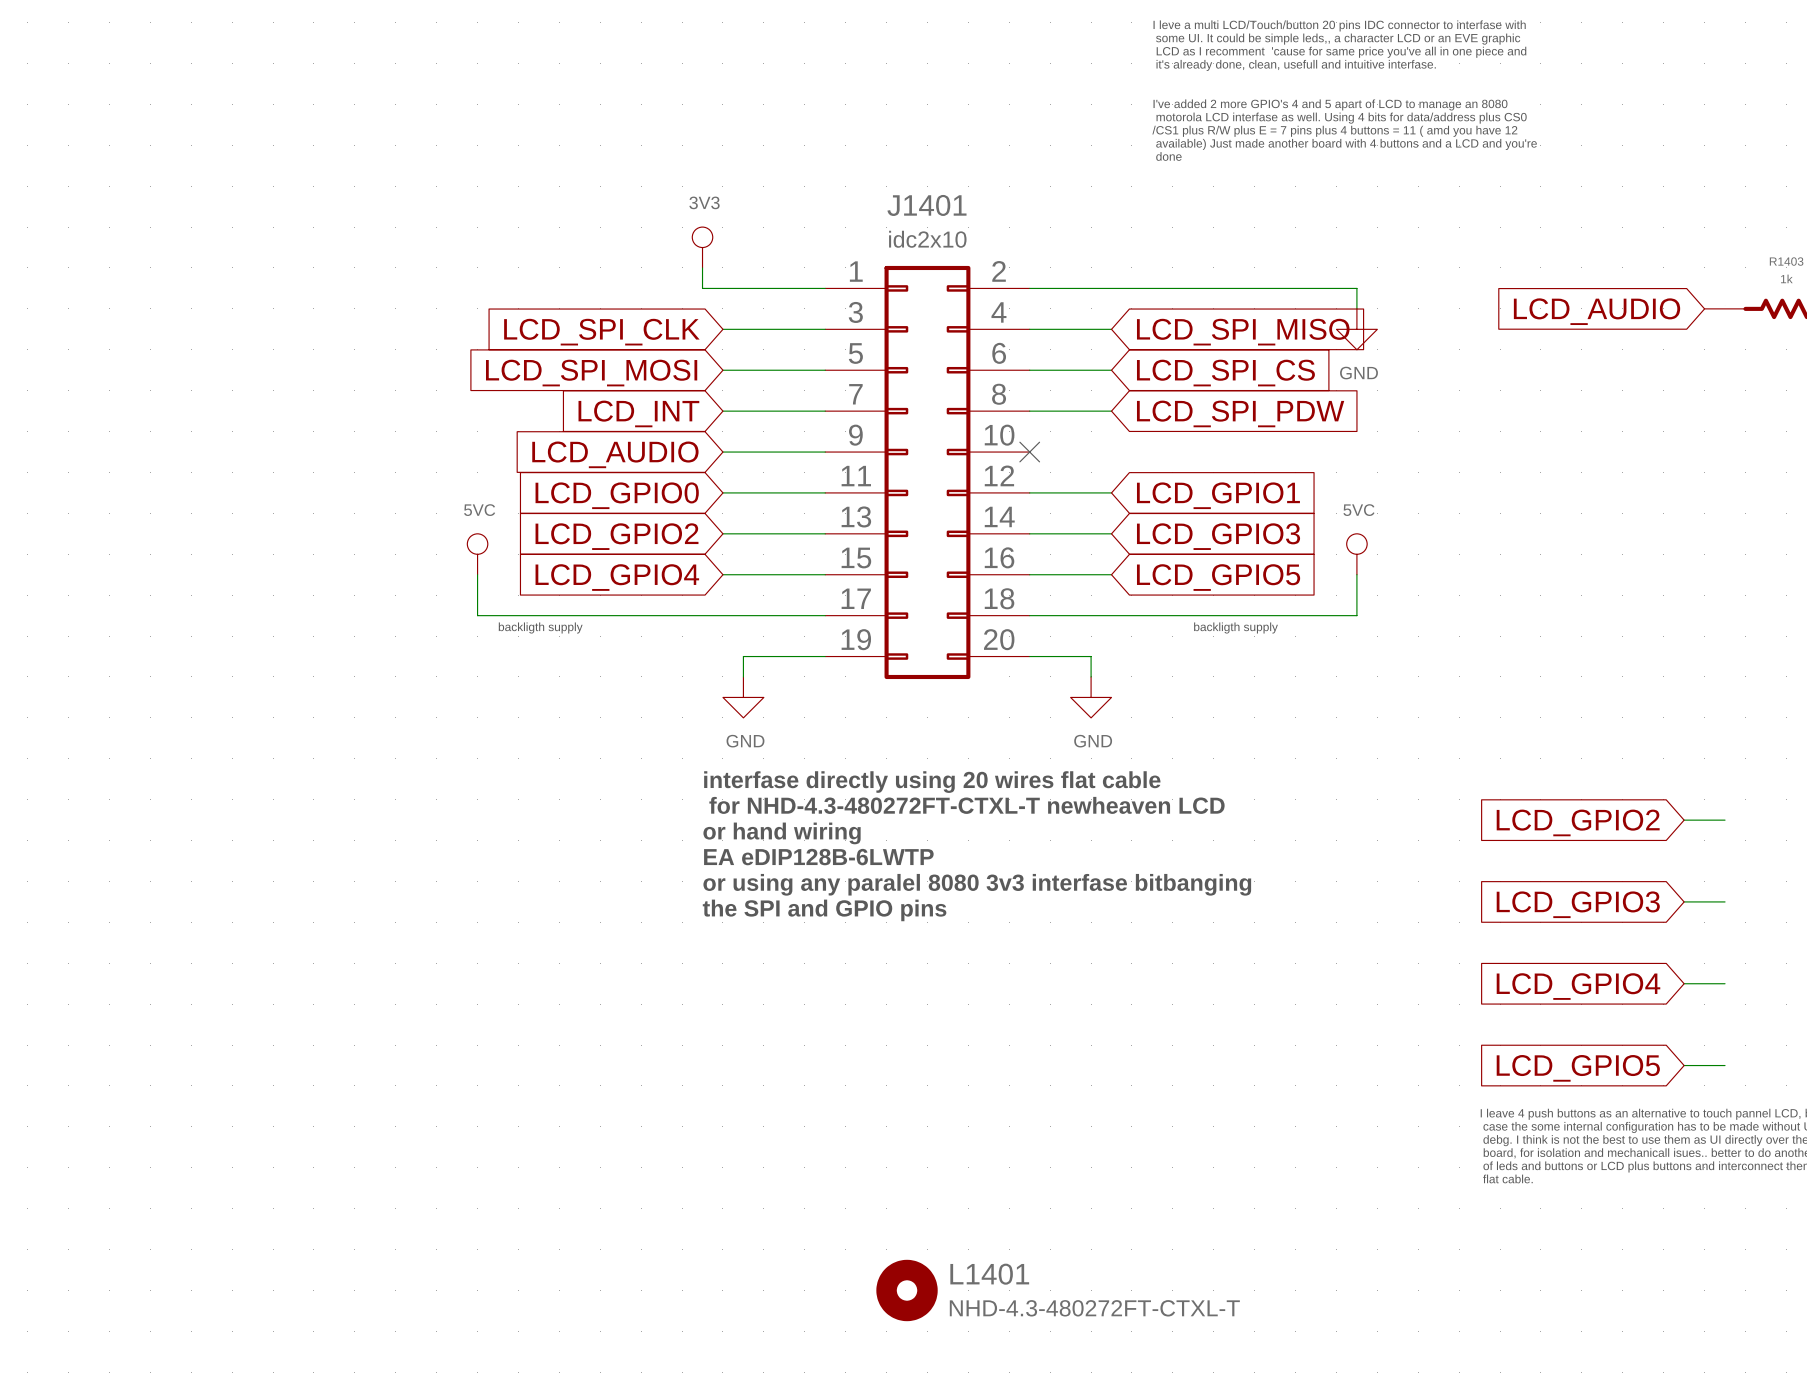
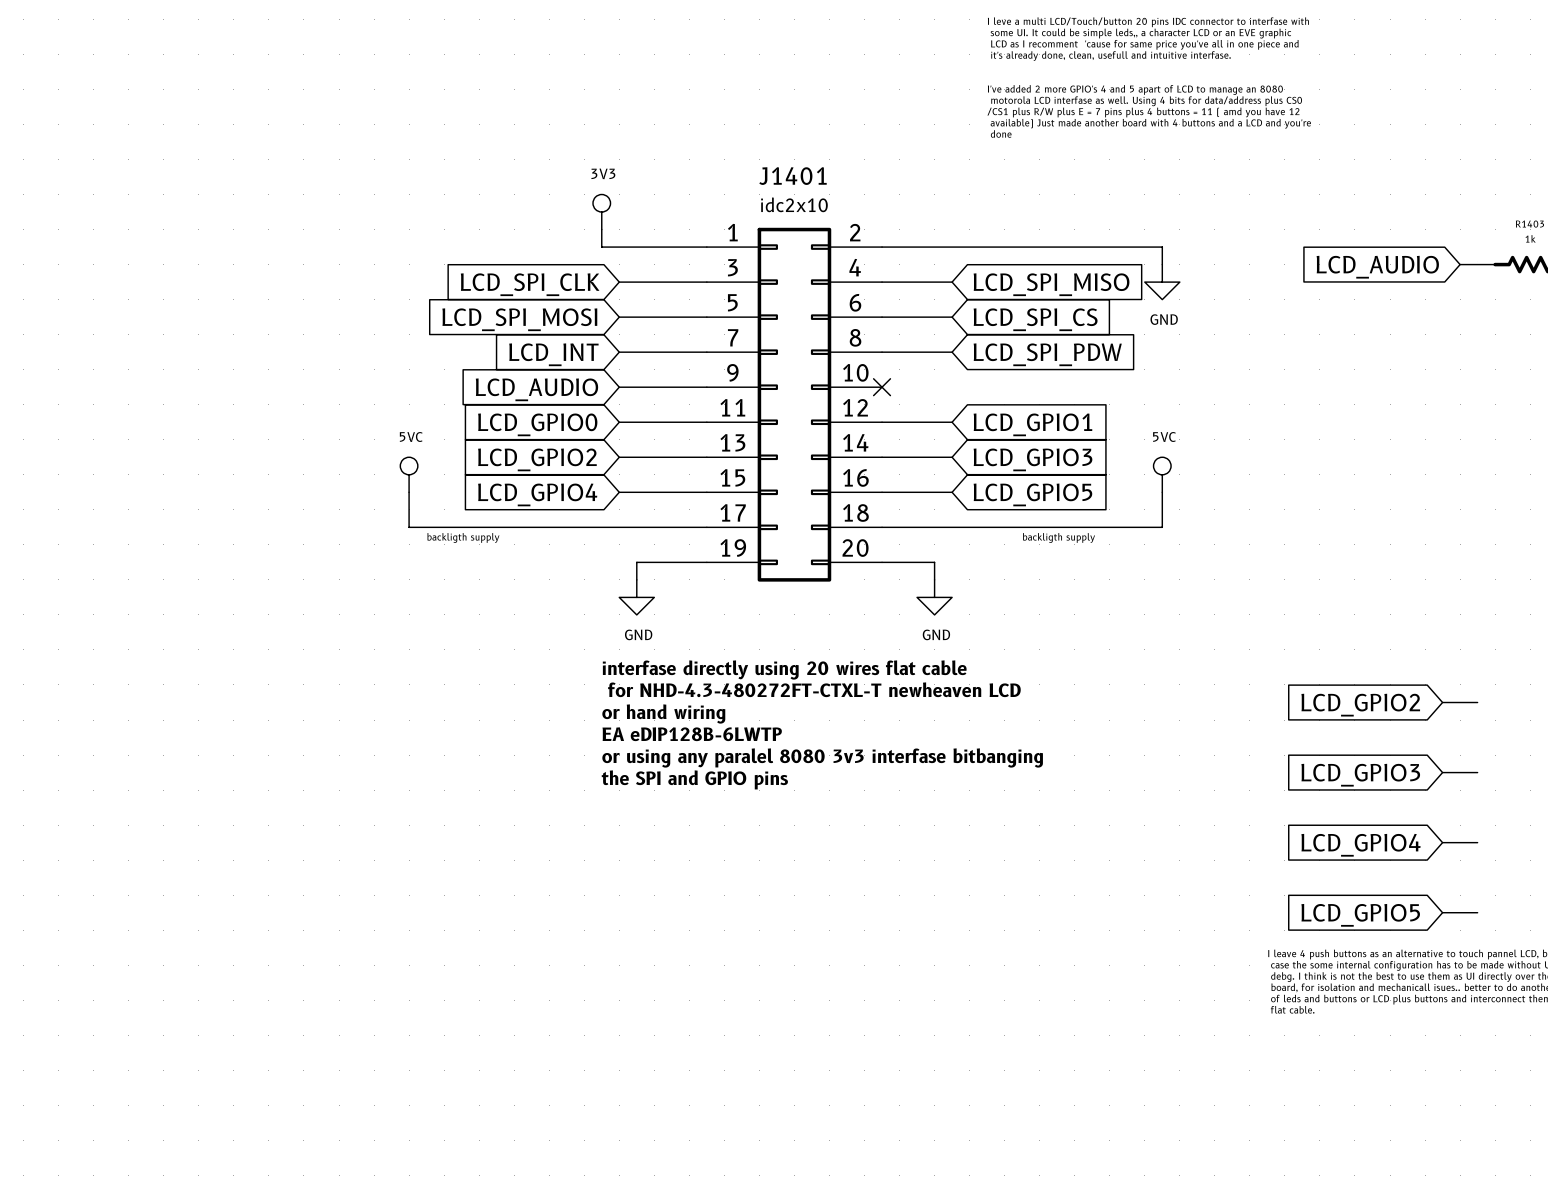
L1401: NHD-4.3-480272FT-CTXL-T (907, 1290) -> none

